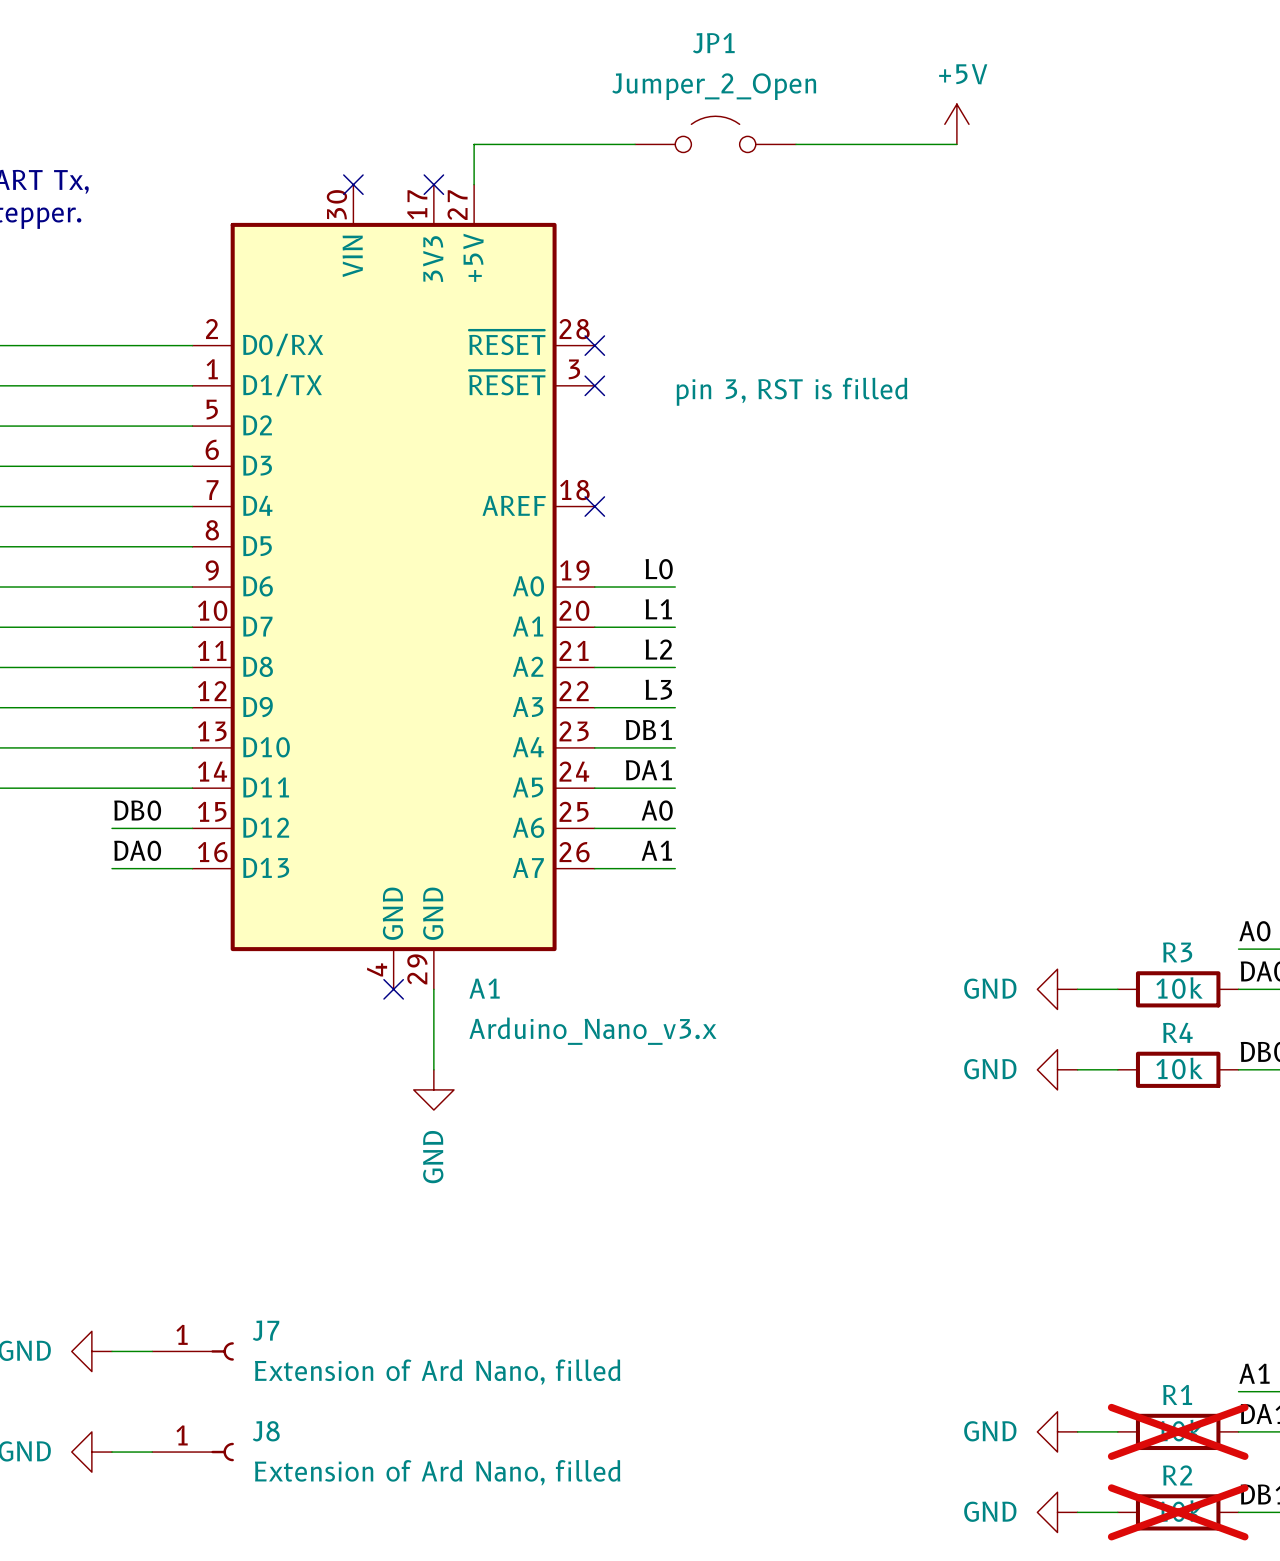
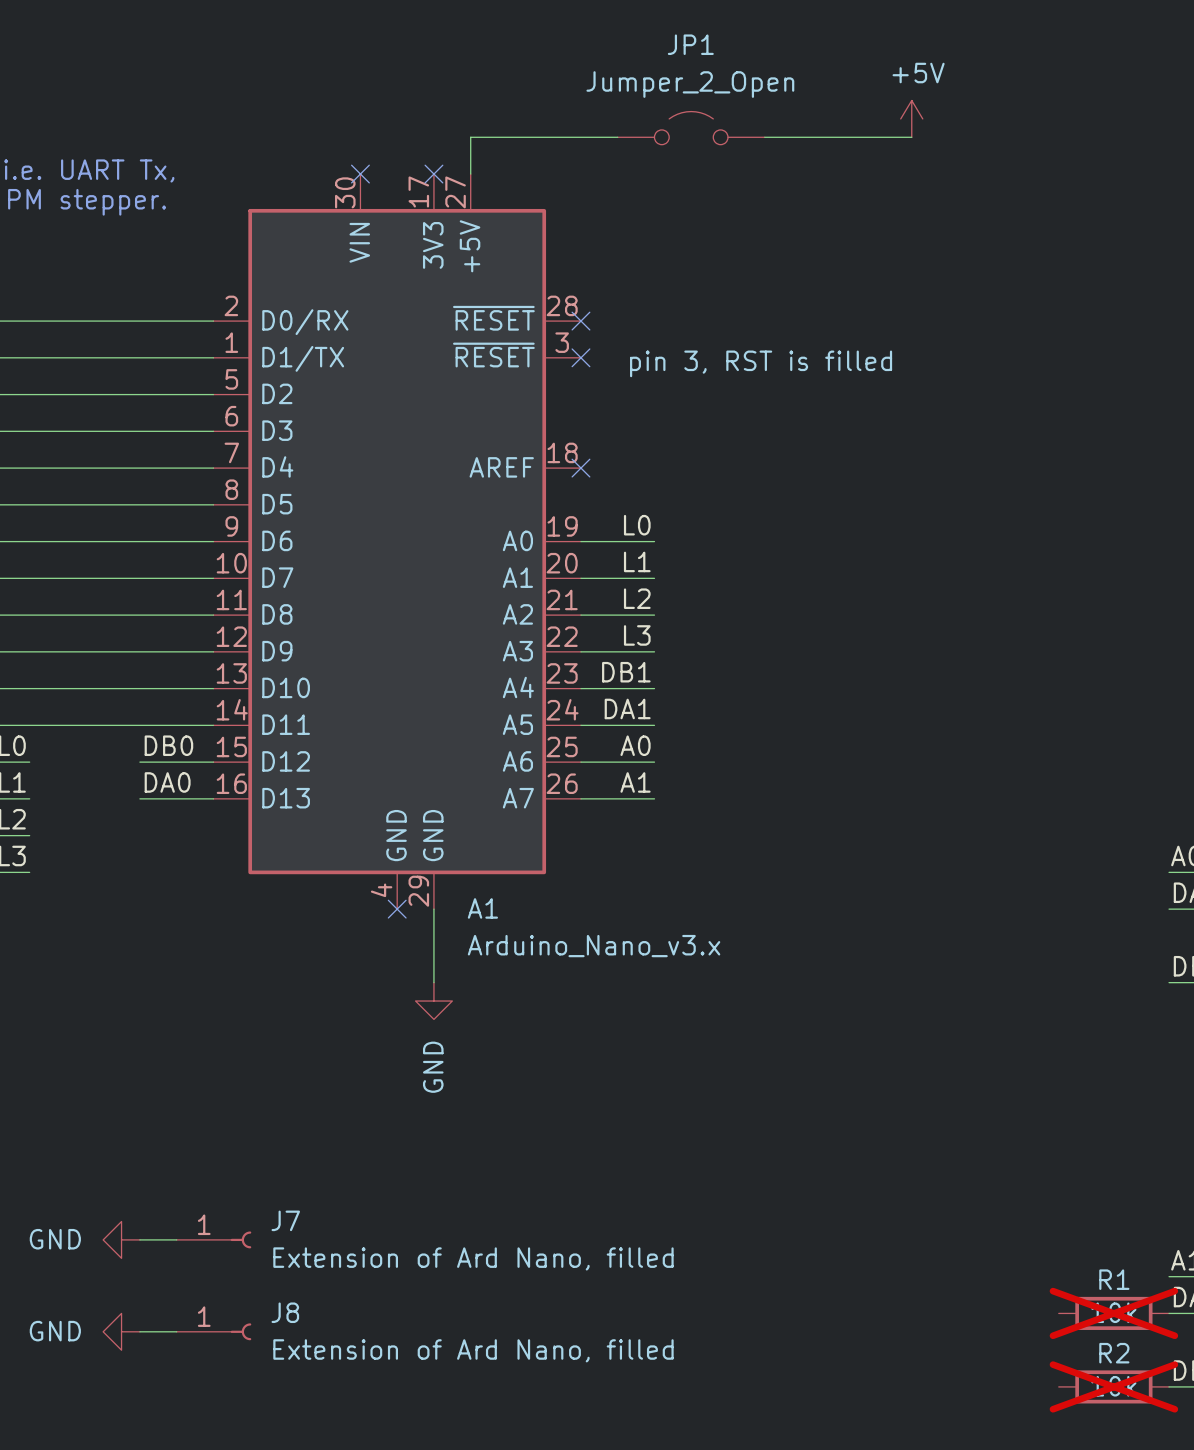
power symbol: GND (1057, 989) -> none
wire: (1077, 989) (1117, 989) -> none
R3: 10k (1178, 989) -> none
power symbol: GND (1057, 1069) -> none
wire: (1077, 1069) (1117, 1069) -> none
R4: 10k (1178, 1069) -> none
power symbol: GND (1057, 1431) -> none
wire: (1077, 1431) (1117, 1431) -> none
power symbol: GND (1057, 1512) -> none
wire: (1077, 1512) (1117, 1512) -> none

